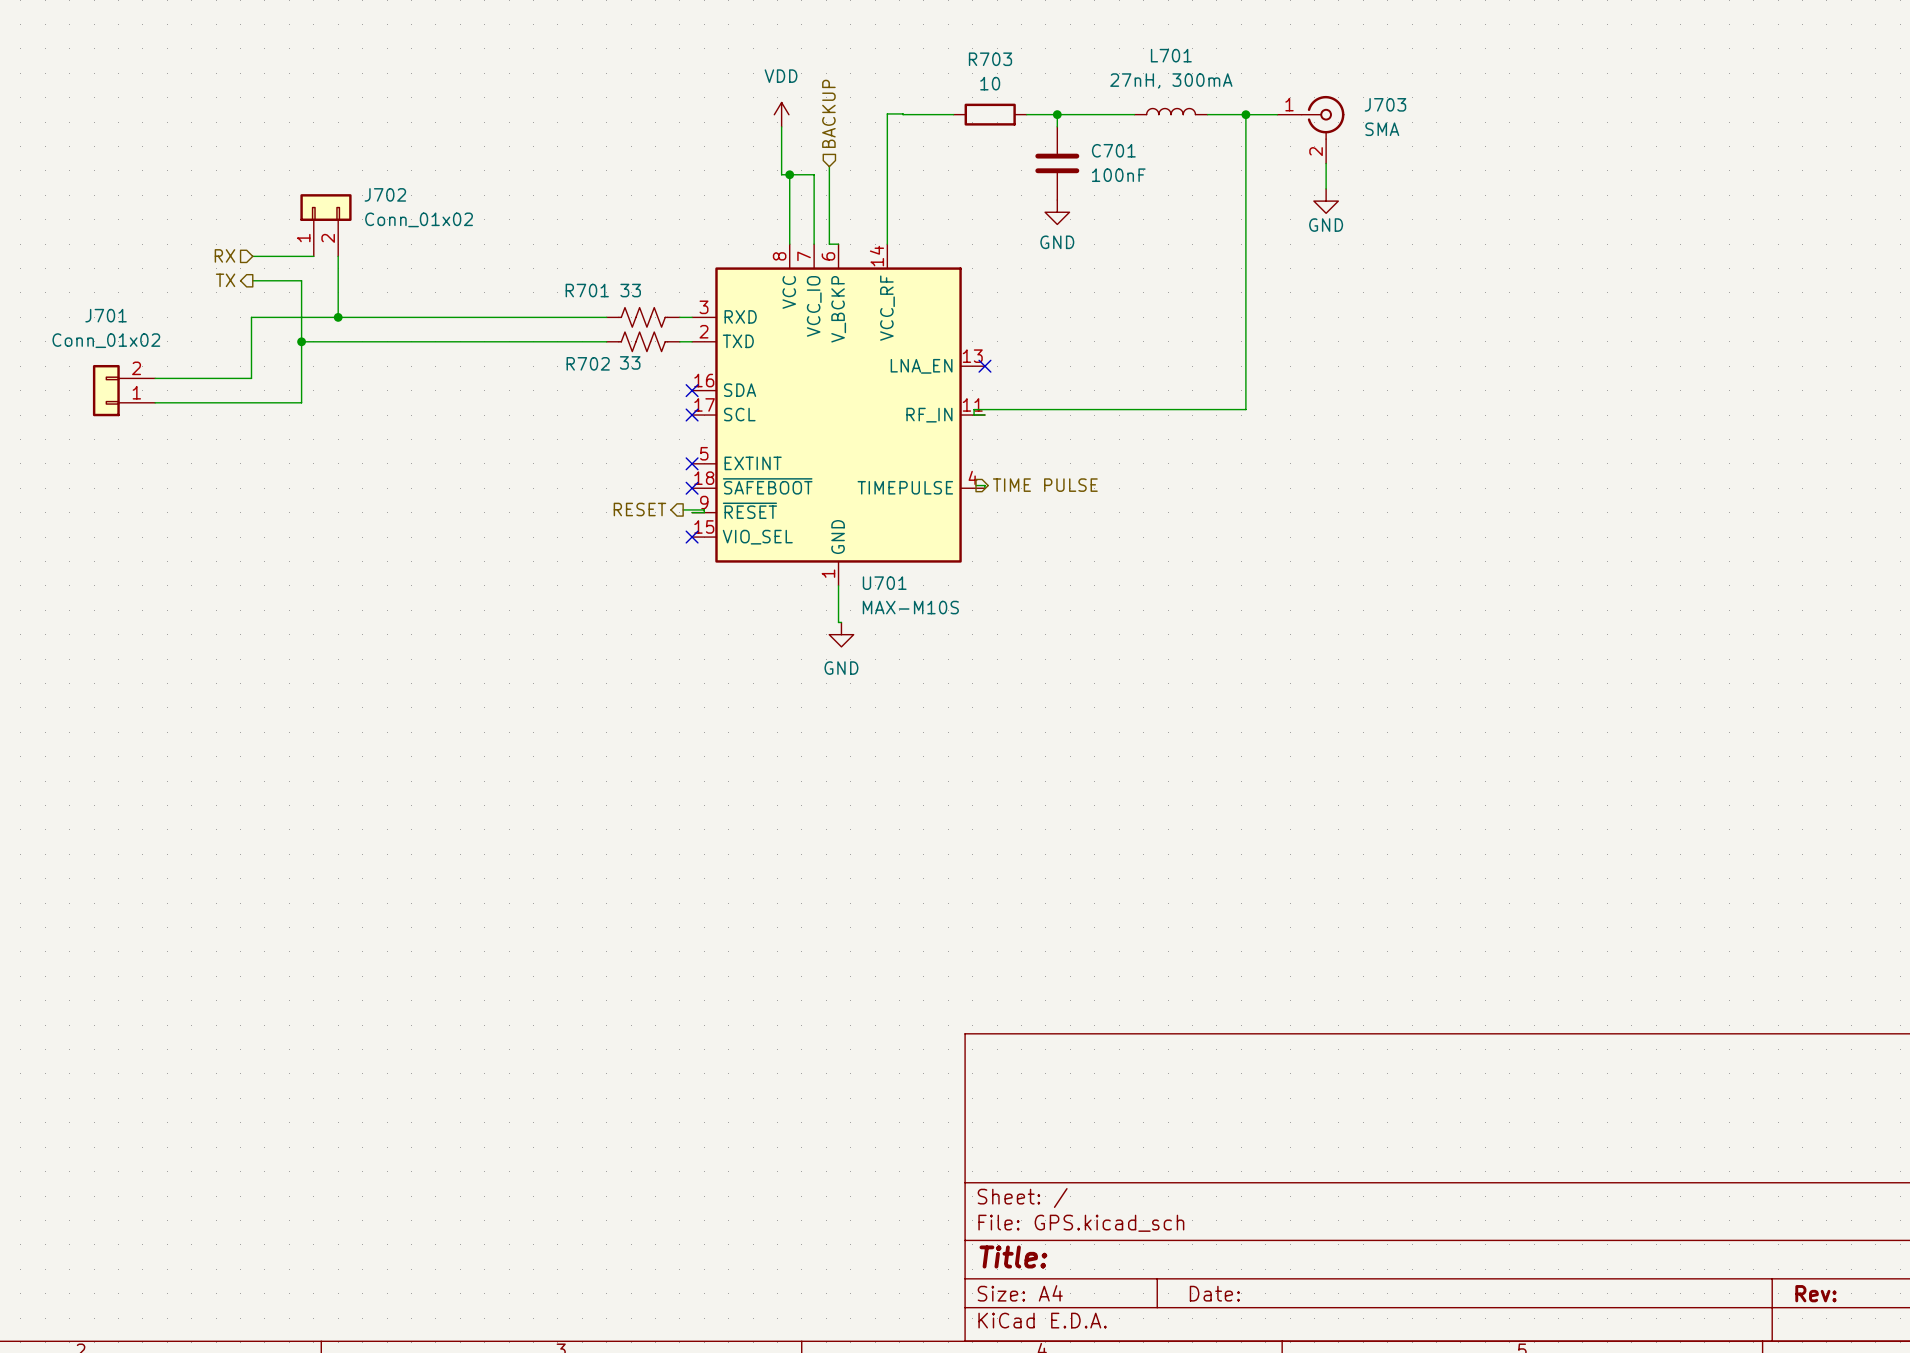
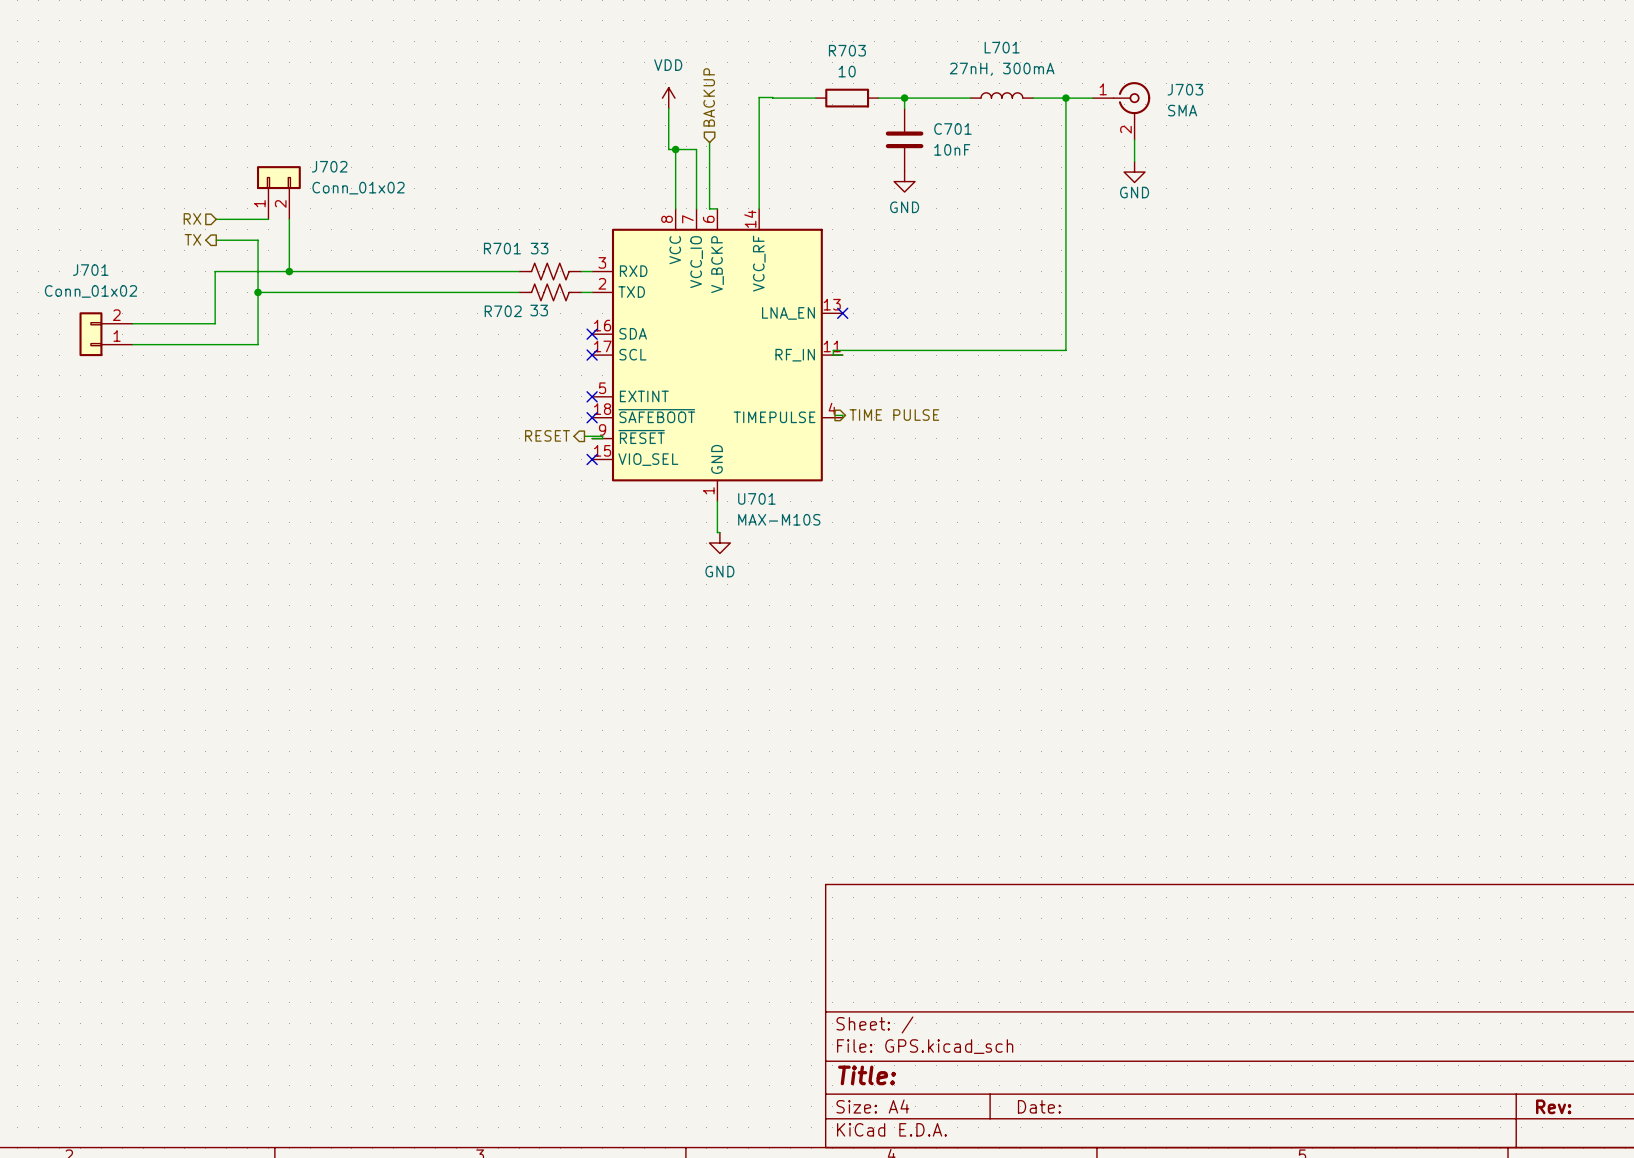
C701 value: 100nF (1118, 175) -> 10nF (952, 149)

